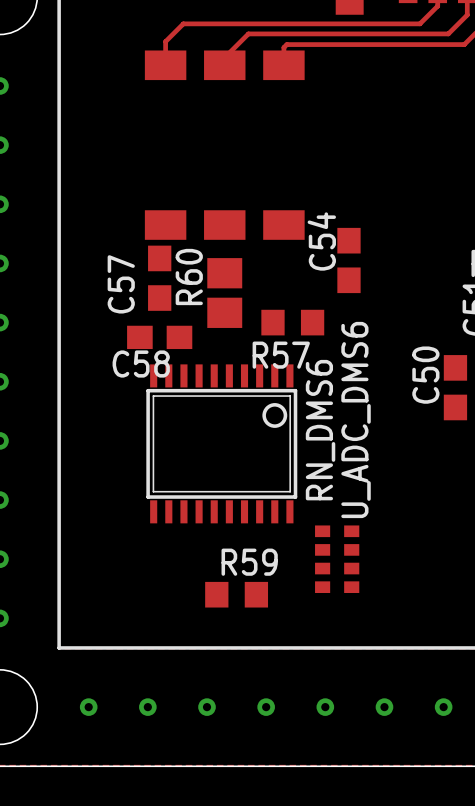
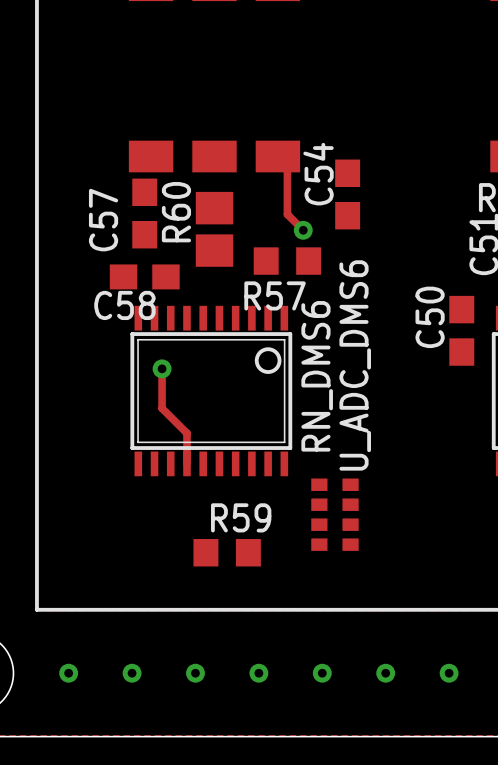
track: none -> (277, 156) (287, 166) (287, 214) (303, 230)
via: none -> (303, 230)
track: none -> (162, 368) (162, 408) (186, 433) (186, 463)
via: none -> (162, 368)

